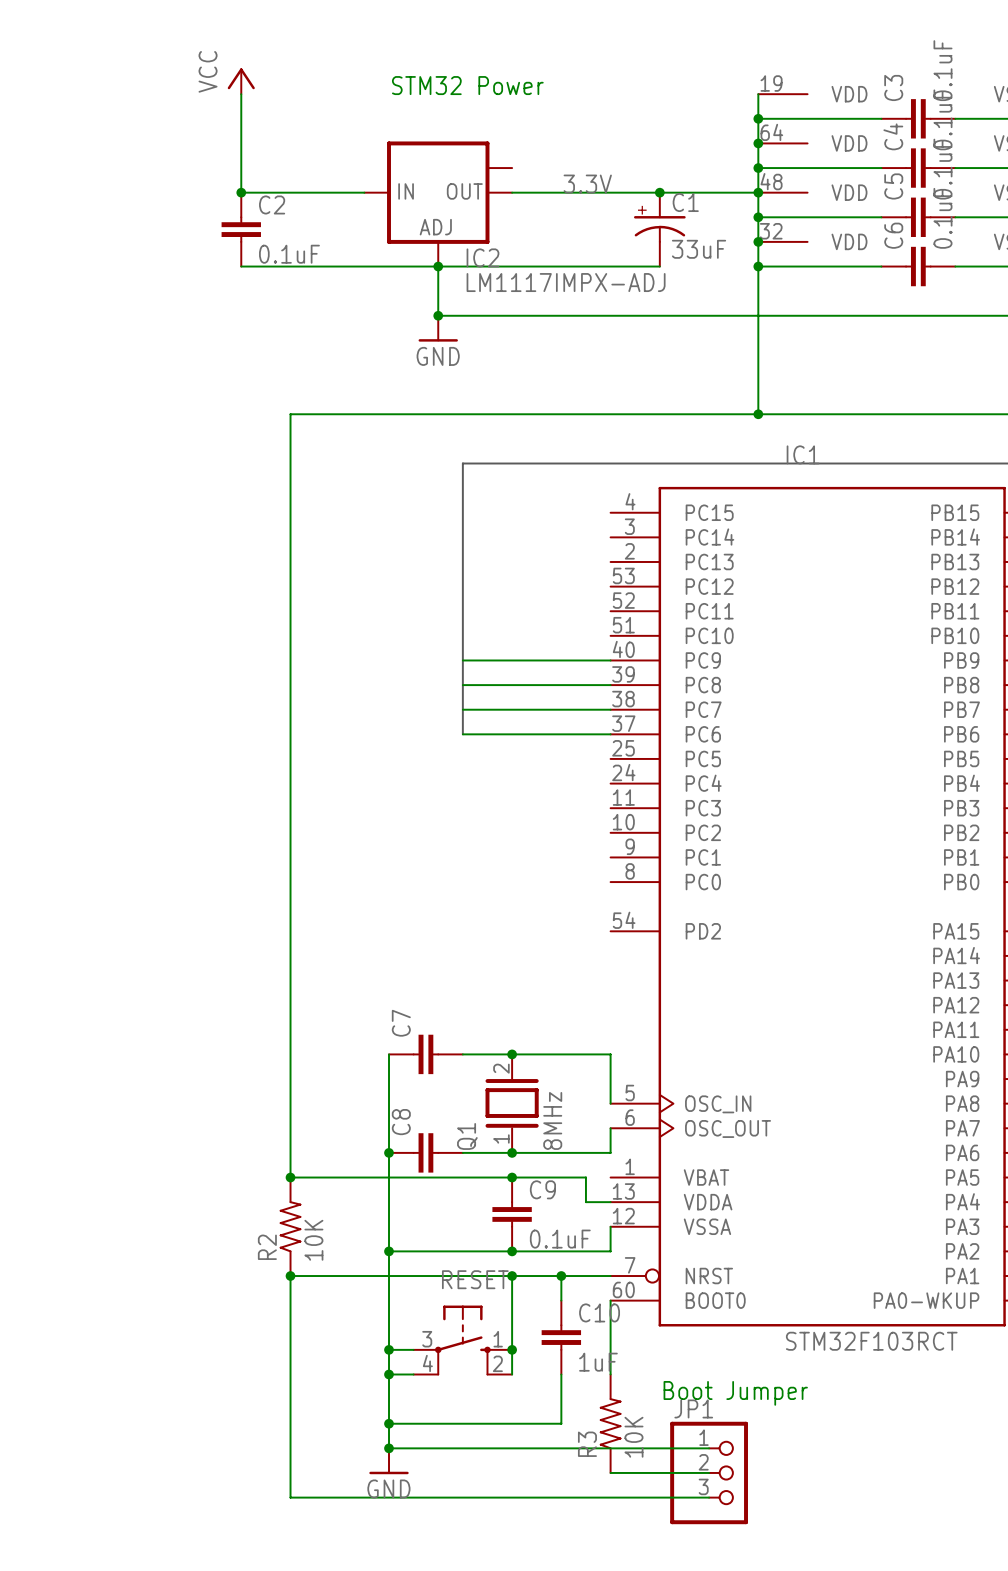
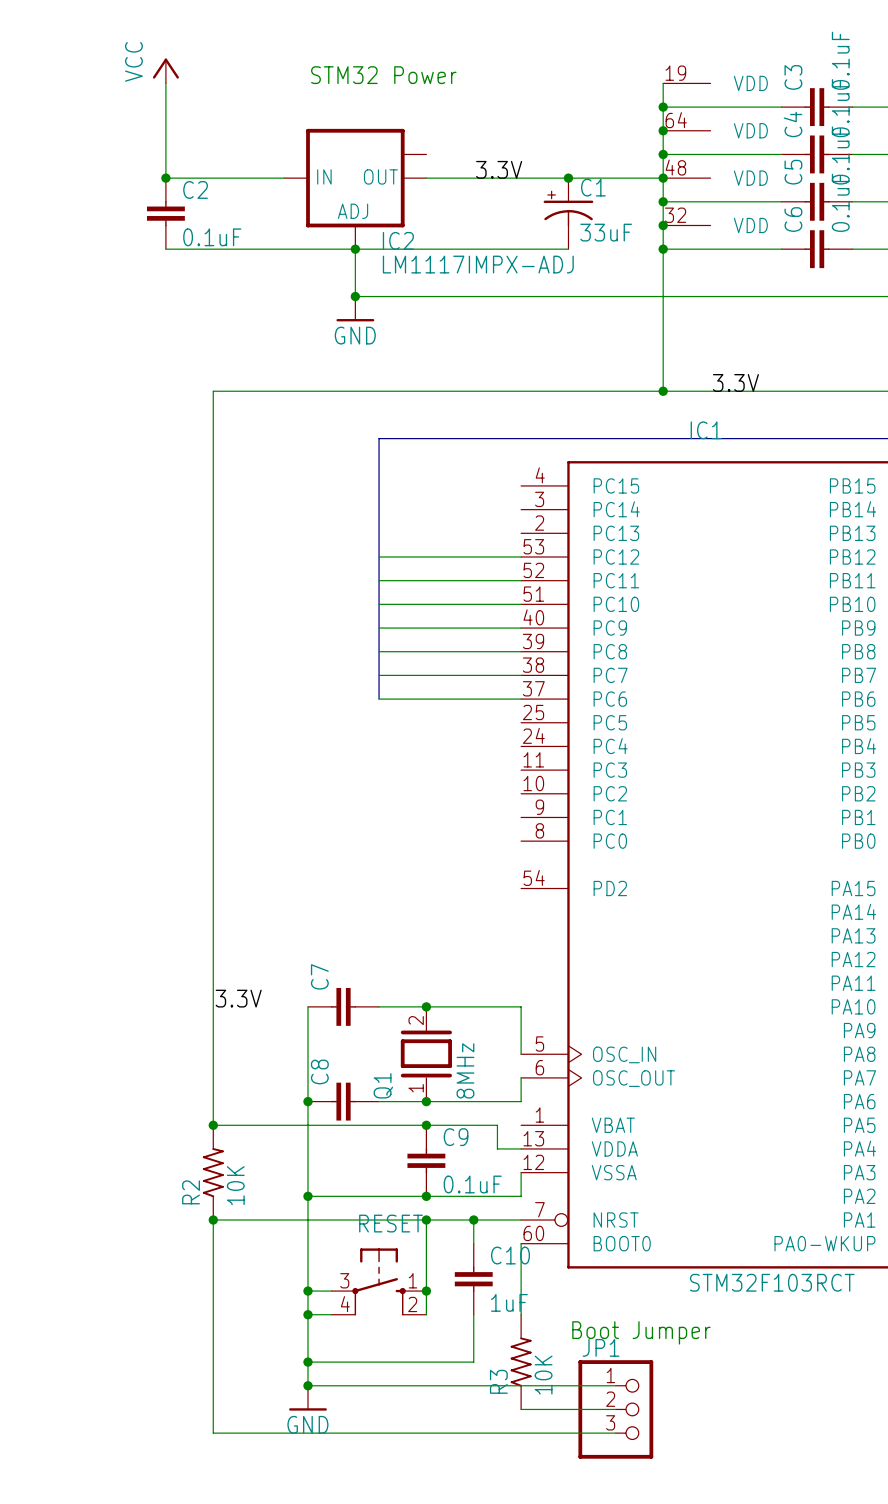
label: none -> 3.3V (735, 382)
wire: none -> (379, 556) (521, 556)
wire: none -> (379, 580) (521, 580)
wire: none -> (379, 604) (521, 604)
label: none -> 3.3V (238, 998)

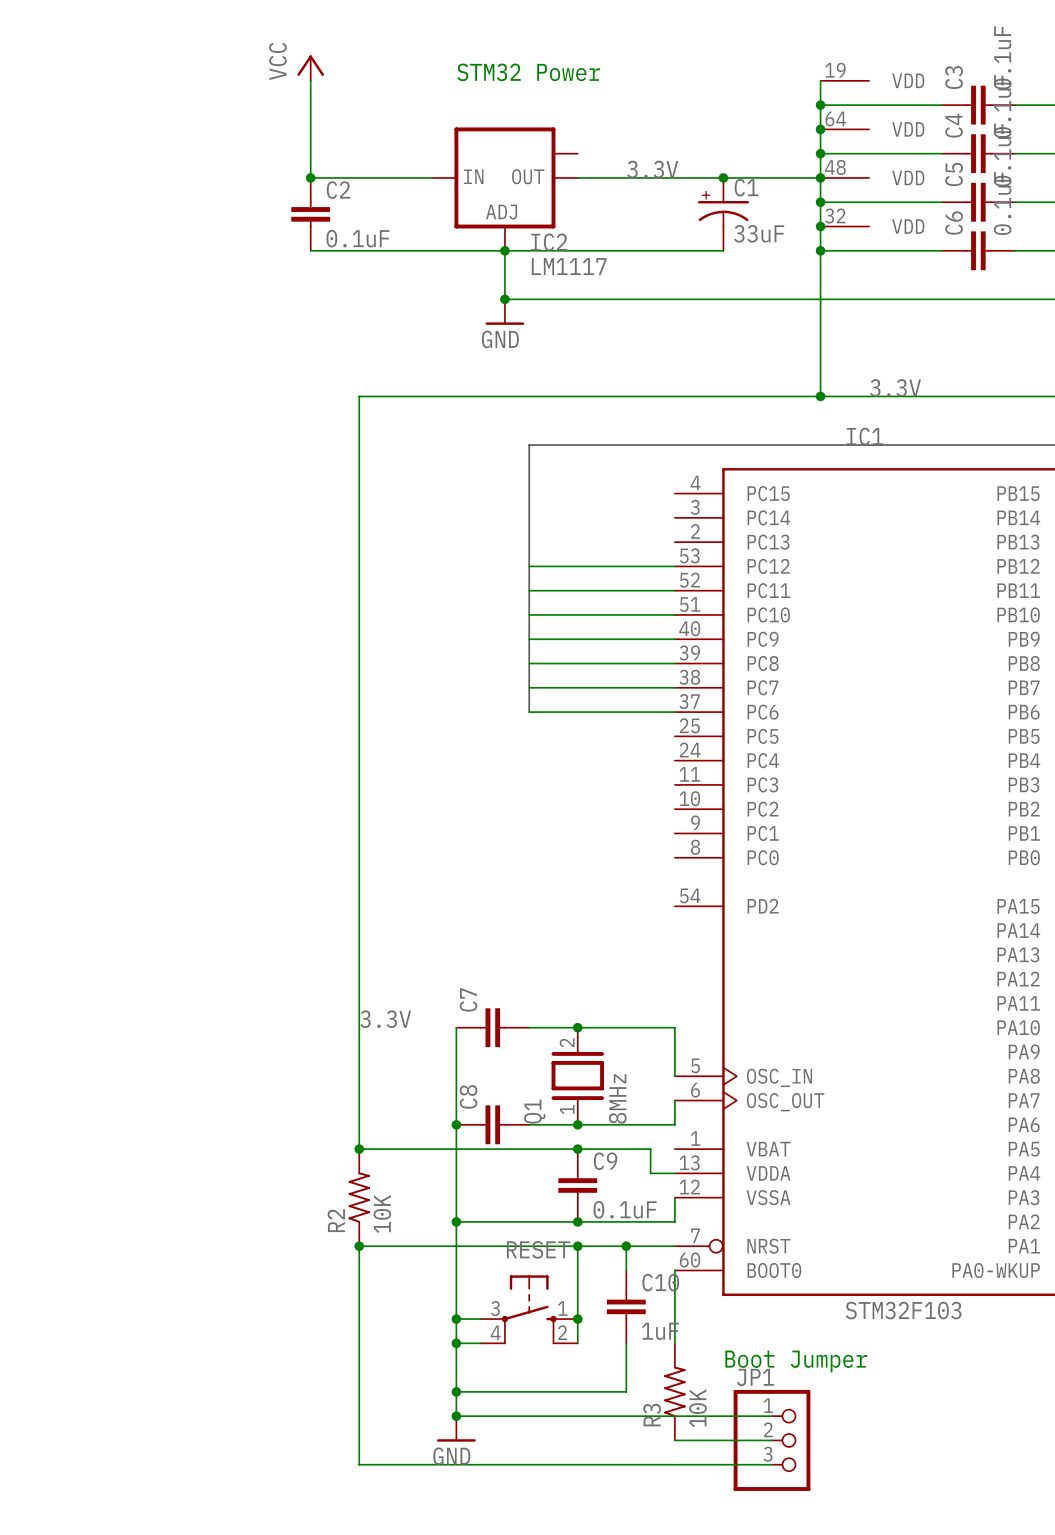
IC2 value: LM1117IMPX-ADJ (478, 264) -> LM1117 (569, 266)
IC1 value: STM32F103RCT (772, 1282) -> STM32F103 (903, 1310)

